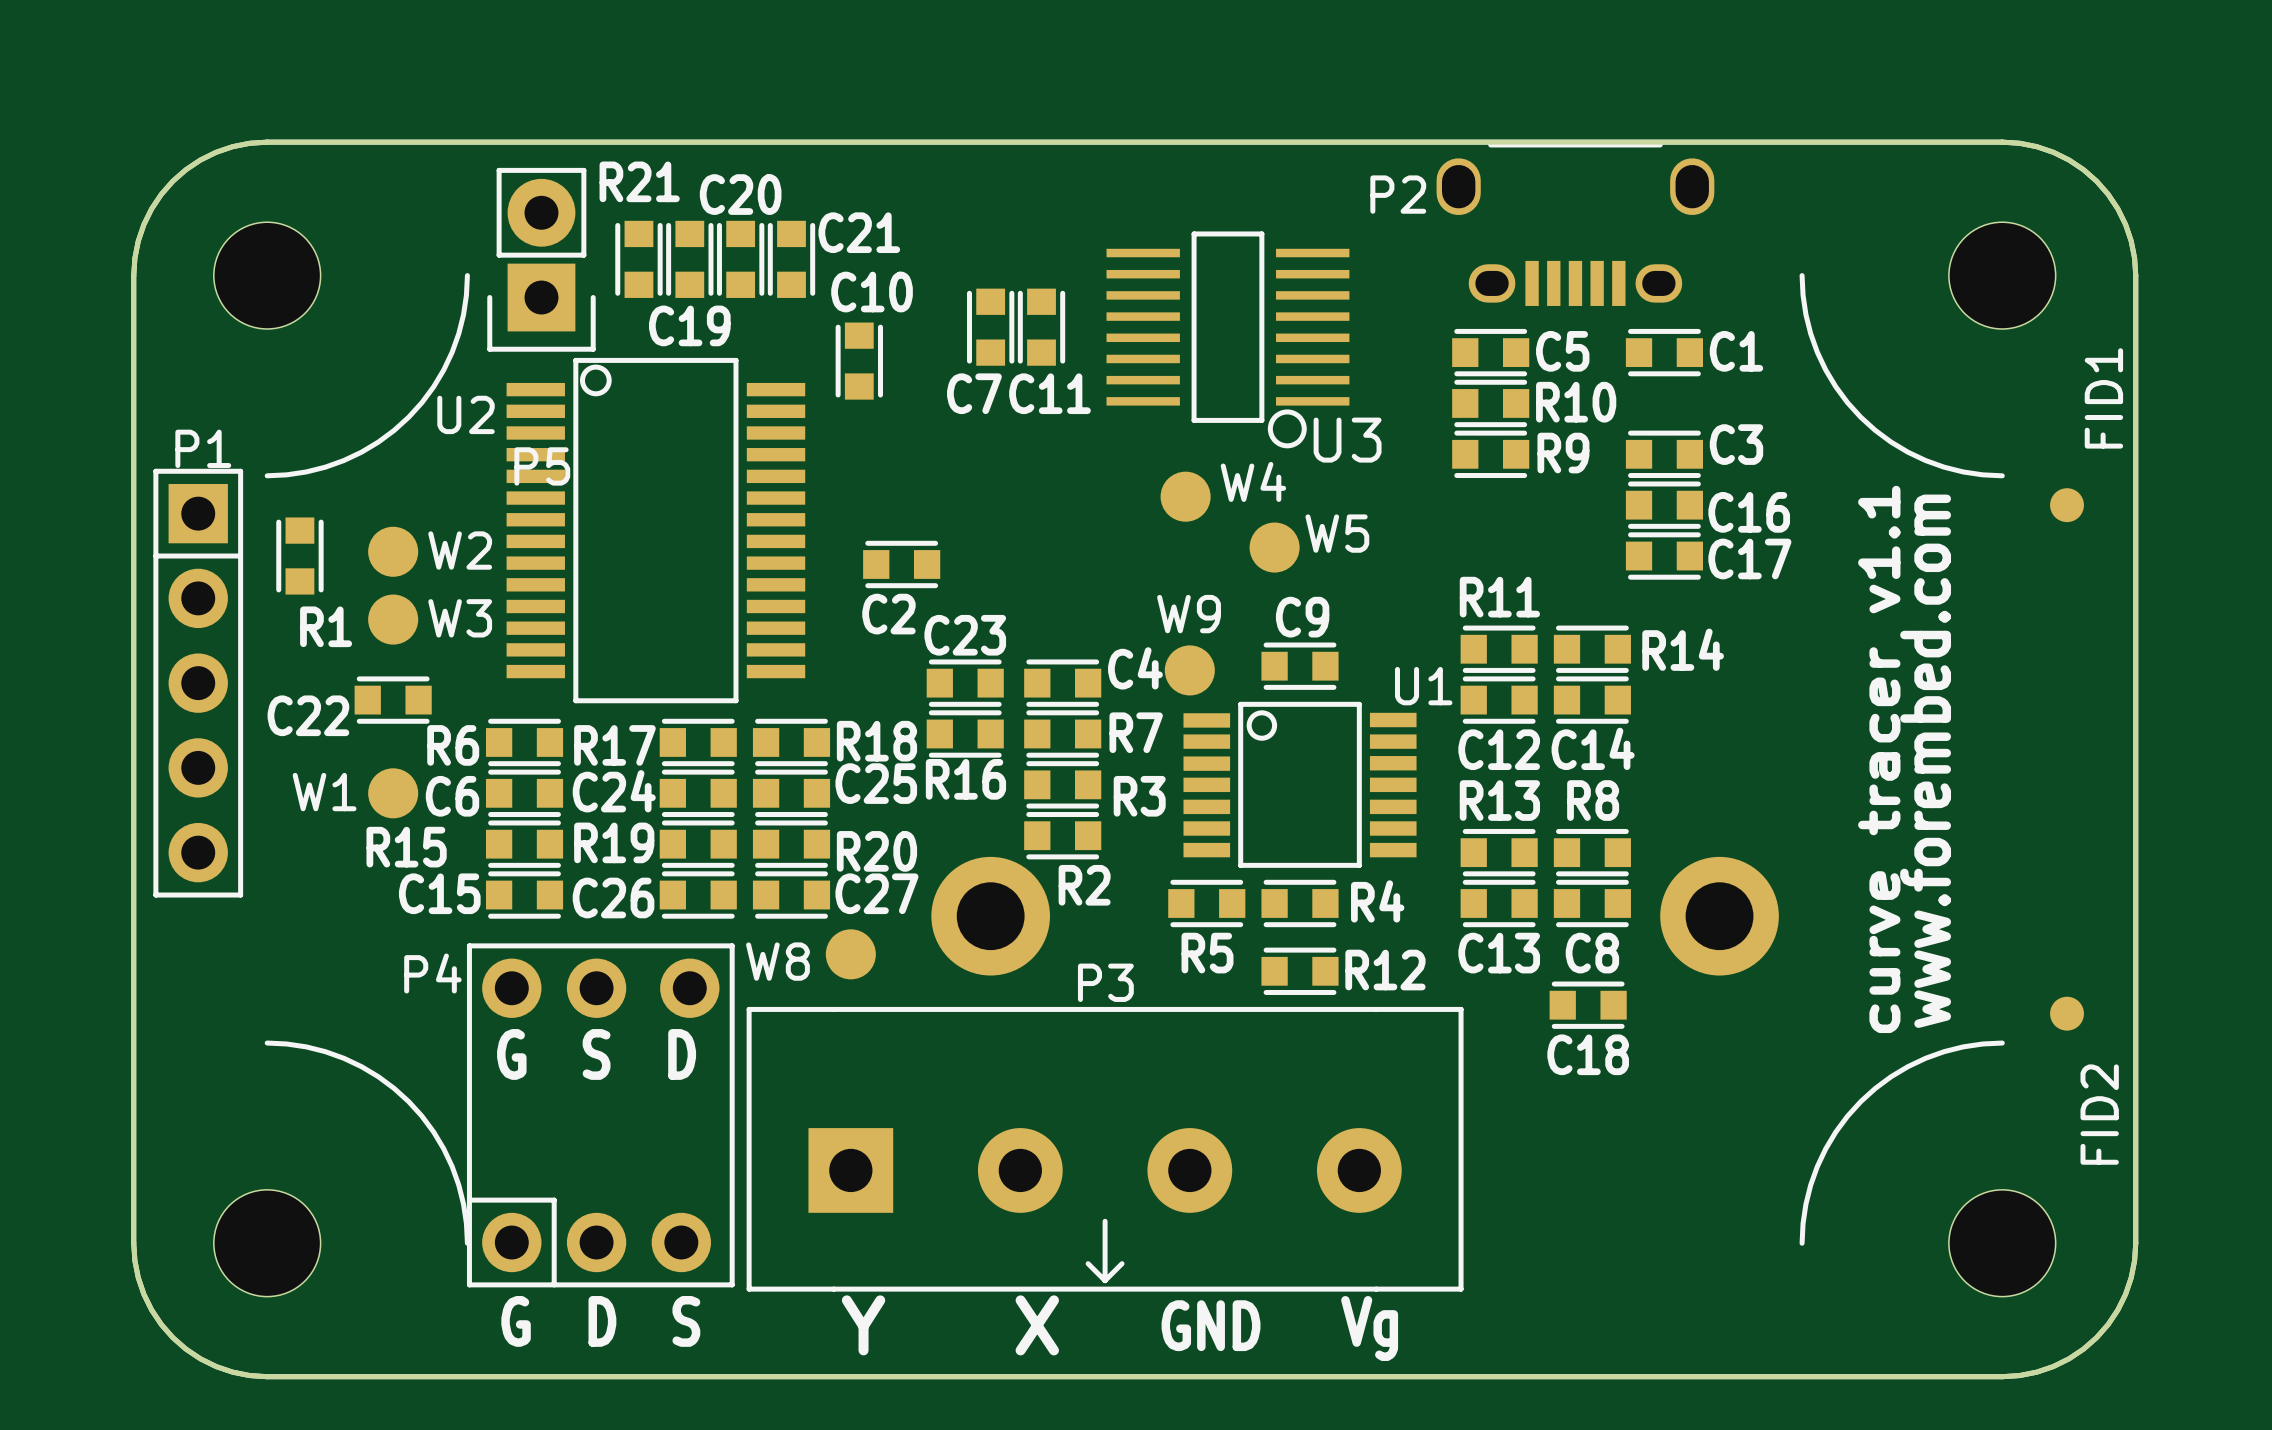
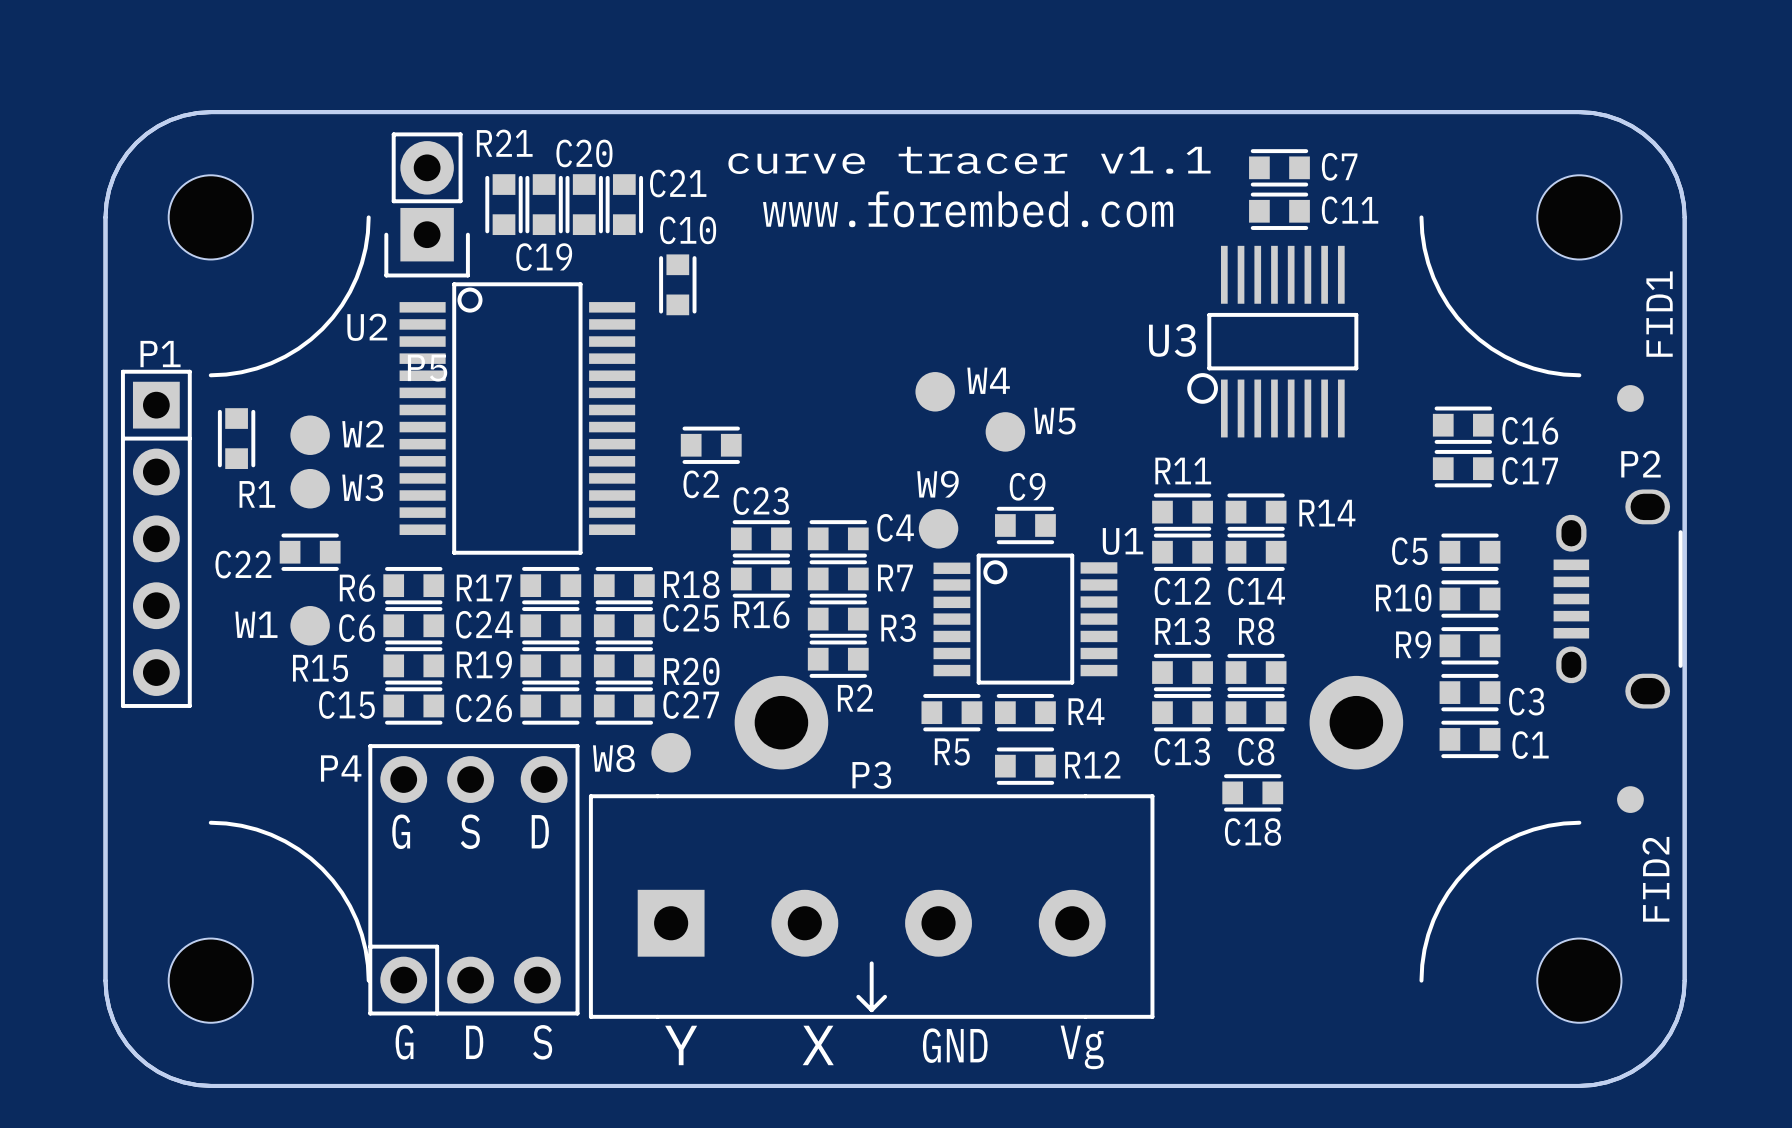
text: none -> curve tracer v1.1 (969, 160)
P2 rotation: 0° (1575, 224) -> 90° clockwise (1618, 599)
P2 position: (1575, 224) -> (1618, 599)
text: none -> www.forembed.com (968, 209)
C7 rotation: 0° (990, 327) -> 90° clockwise (1279, 167)
C7 position: (990, 327) -> (1279, 167)
C11 rotation: 0° (1041, 327) -> 90° clockwise (1279, 211)
C11 position: (1041, 327) -> (1279, 211)
U3 rotation: 0° (1227, 339) -> 90° clockwise (1272, 341)
U3 position: (1227, 339) -> (1272, 341)
C5 name position: C5 (1562, 351) -> C5 (1409, 551)
C1 name position: C1 (1736, 351) -> C1 (1530, 745)
C5 position: (1490, 352) -> (1470, 552)
C1 position: (1664, 352) -> (1470, 739)
C7 name position: C7 (974, 393) -> C7 (1339, 166)
C11 name position: C11 (1049, 393) -> C11 (1350, 210)
R10 name position: R10 (1576, 402) -> R10 (1403, 598)
R10 position: (1490, 403) -> (1470, 599)
U3 name position: U3 (1347, 440) -> U3 (1172, 340)
C3 name position: C3 (1736, 444) -> C3 (1526, 701)
R9 name position: R9 (1563, 453) -> R9 (1413, 644)
R9 position: (1490, 454) -> (1470, 645)
C3 position: (1664, 454) -> (1470, 692)
C16 position: (1664, 505) -> (1463, 425)
C17 position: (1664, 556) -> (1463, 468)
text: curve tracer v1.1 (1879, 759) -> none
text: www.forembed.com (1925, 761) -> none

